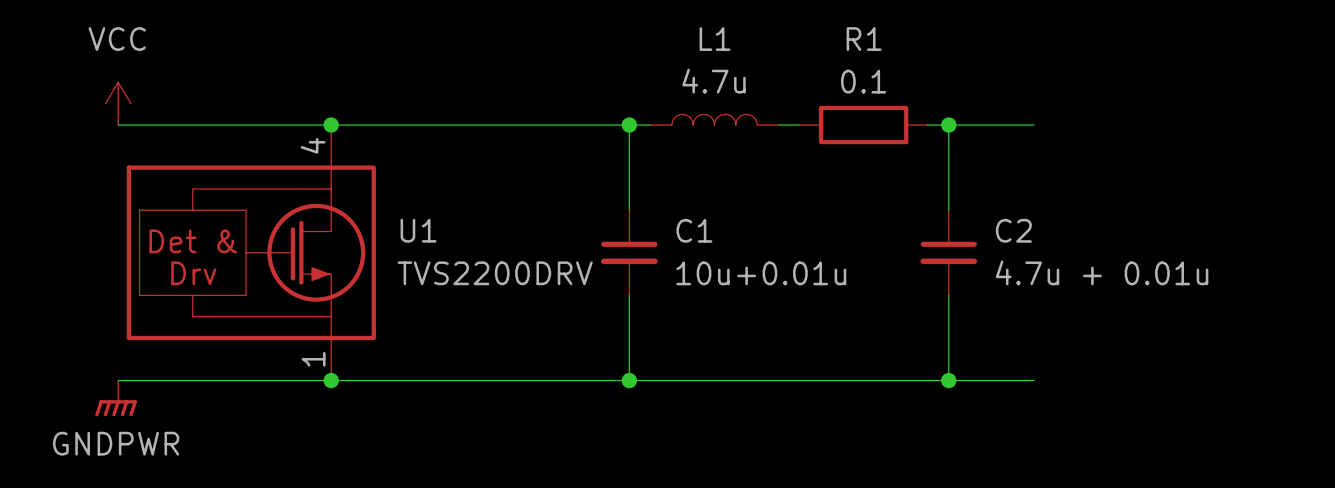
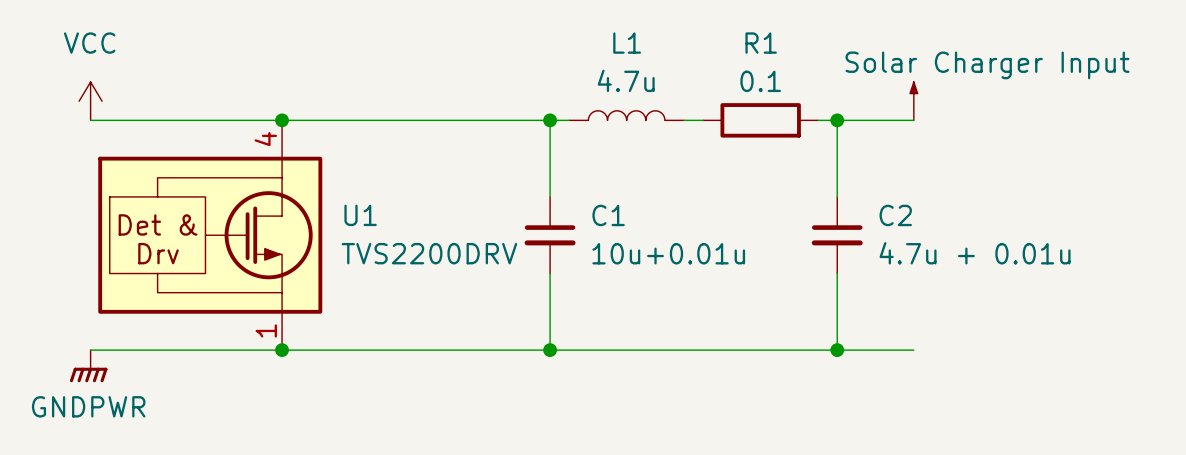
power symbol: none -> Solar Charger Input (913, 101)

